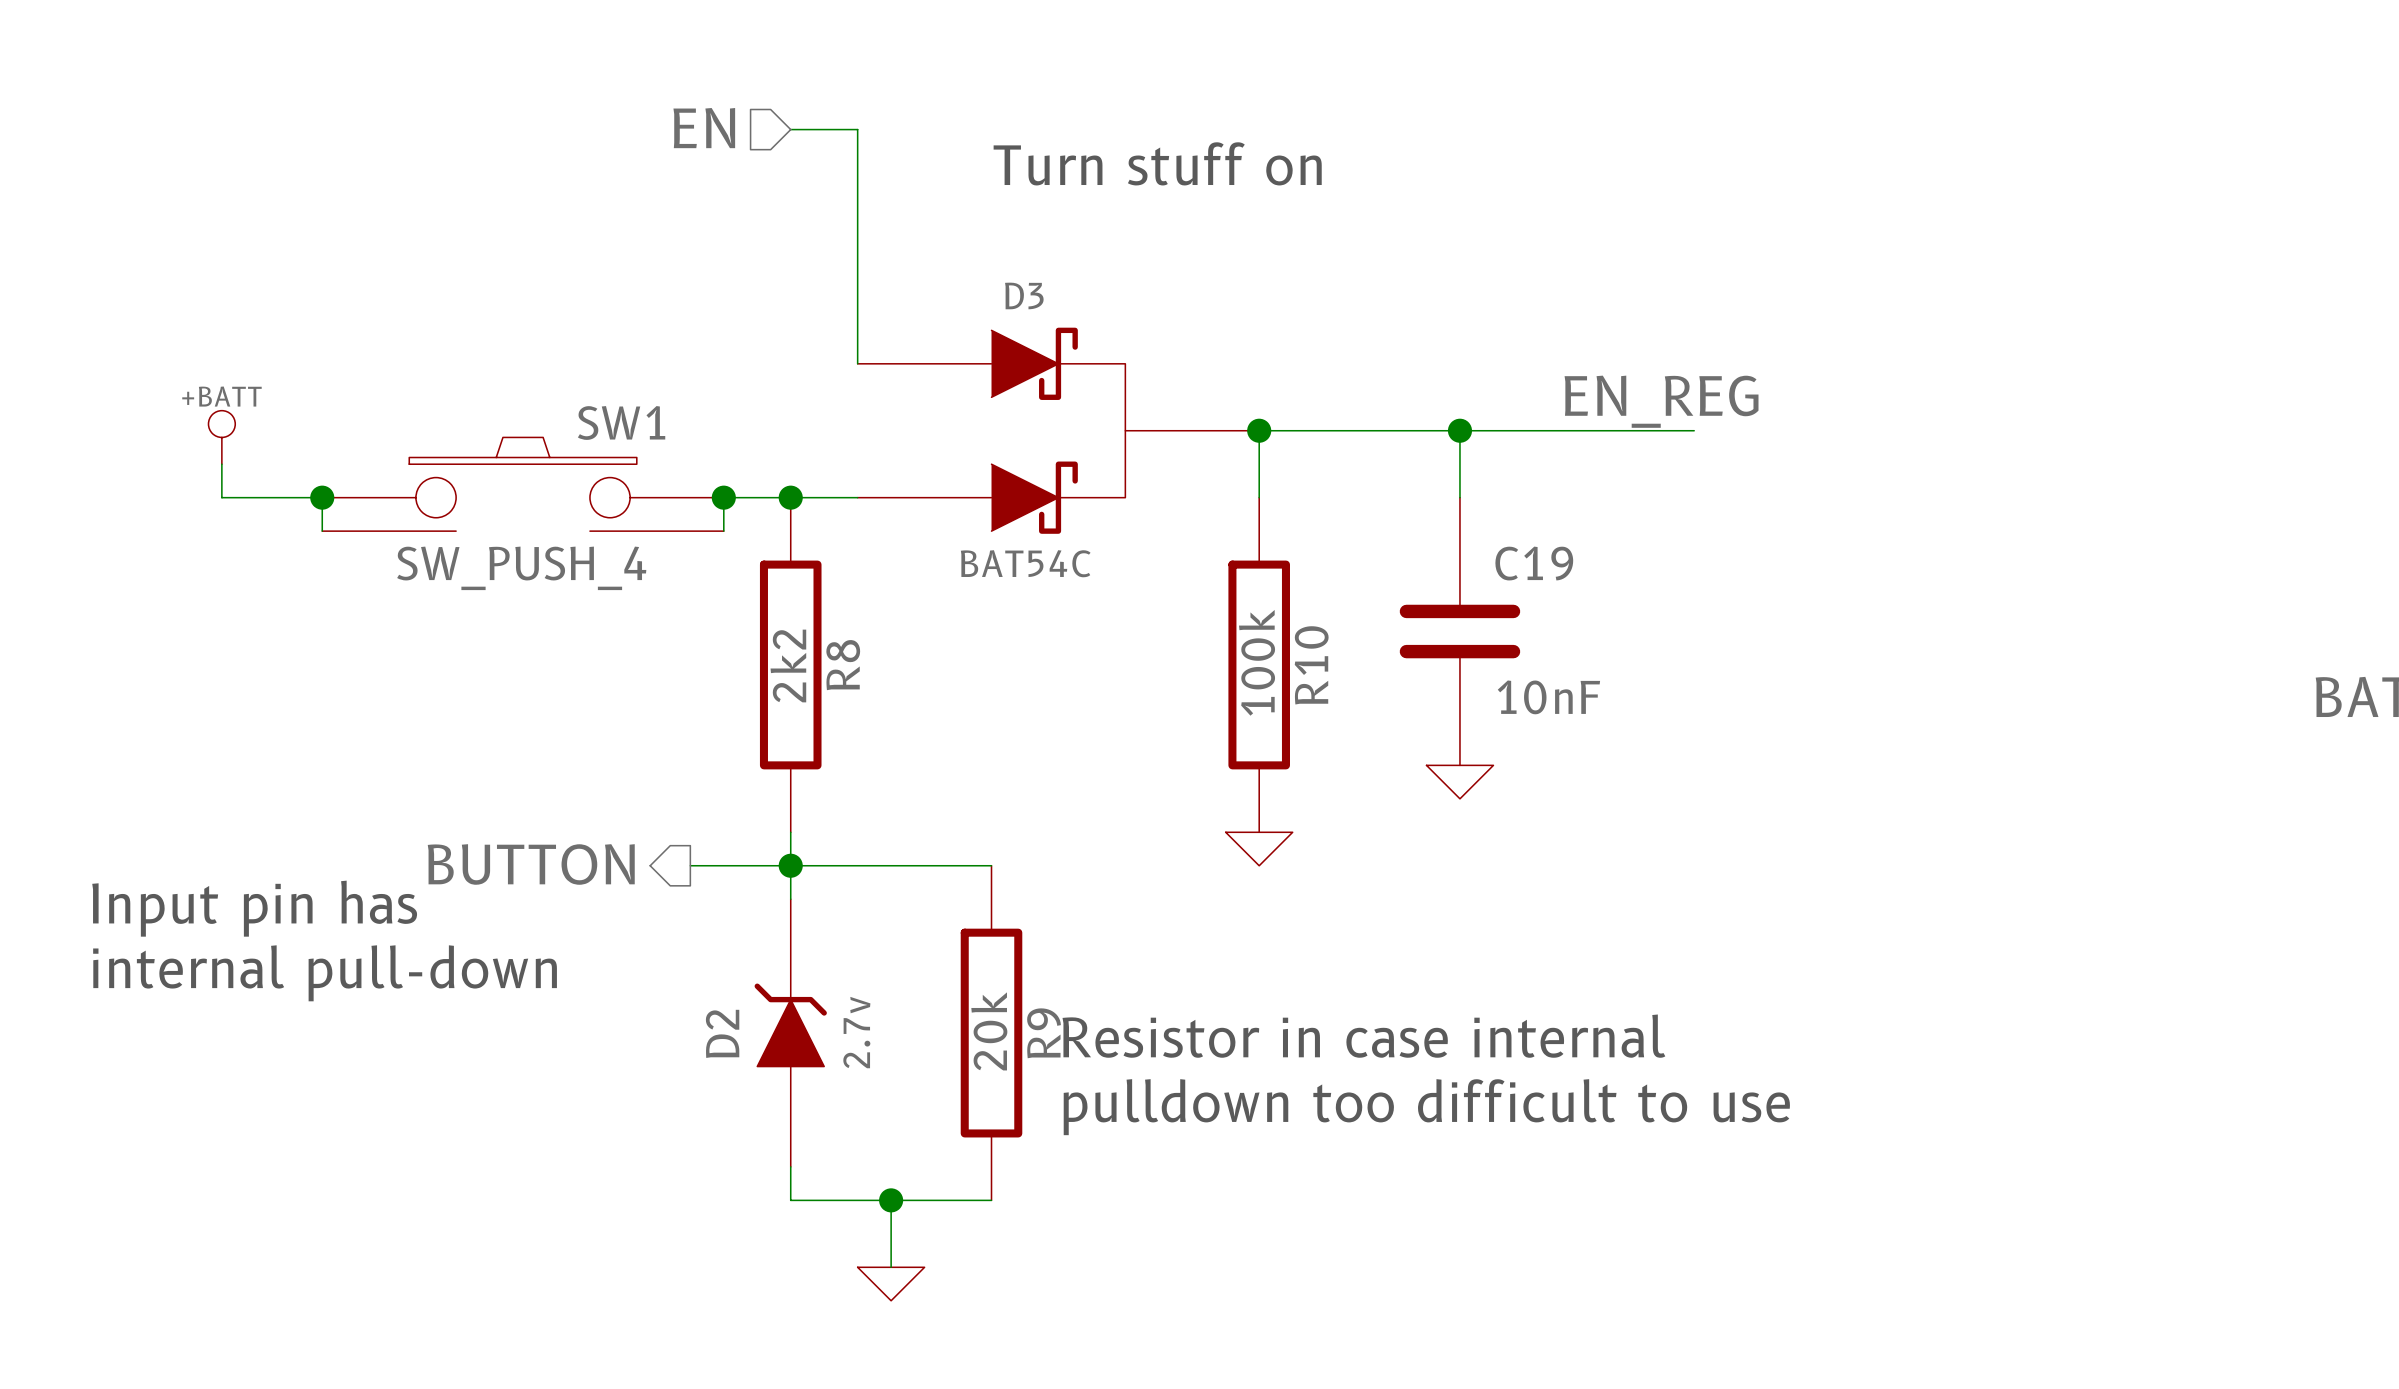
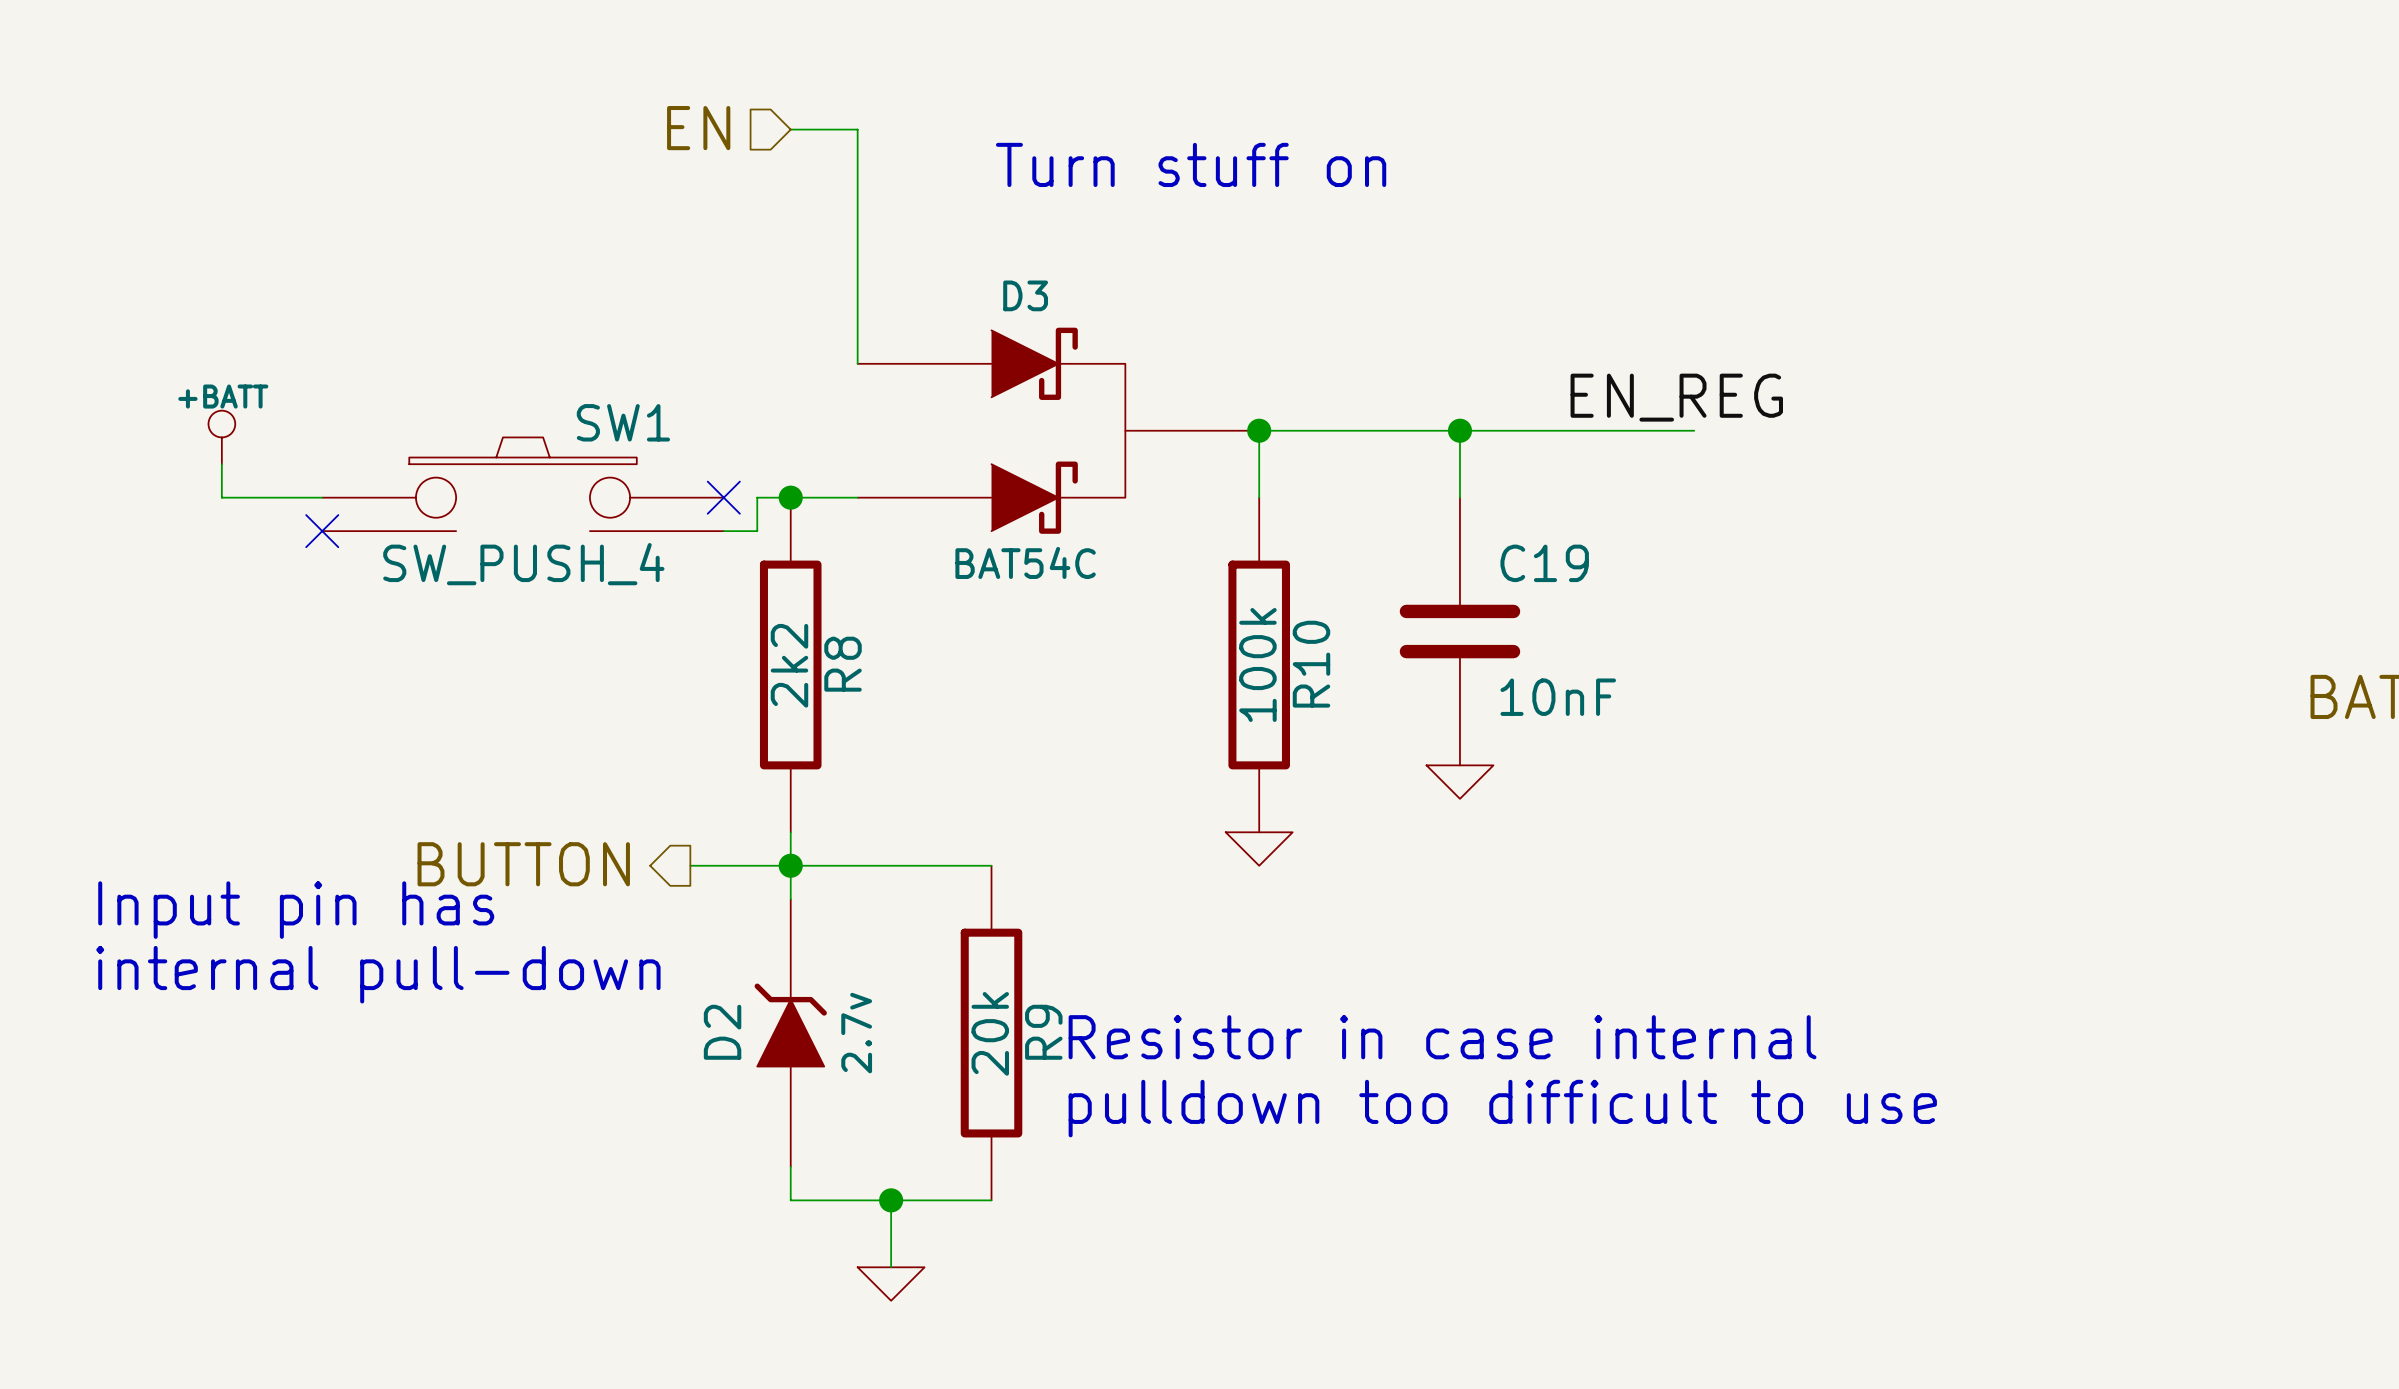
wire: (322, 497) (322, 531) -> none
junction: (322, 497) -> none
junction: (723, 497) -> none
no-connect mark: none -> (723, 497)
wire: (757, 497) (723, 497) (723, 531) -> (757, 497) (757, 531) (723, 531)
no-connect mark: none -> (322, 531)

